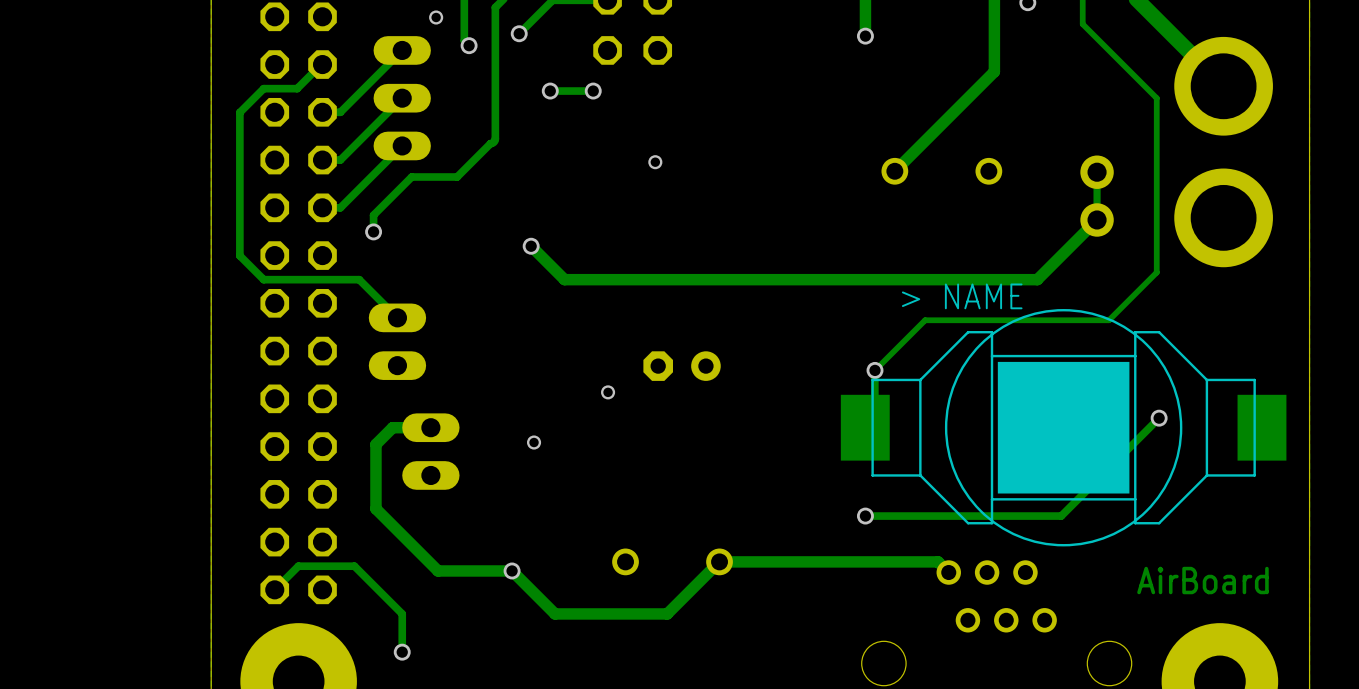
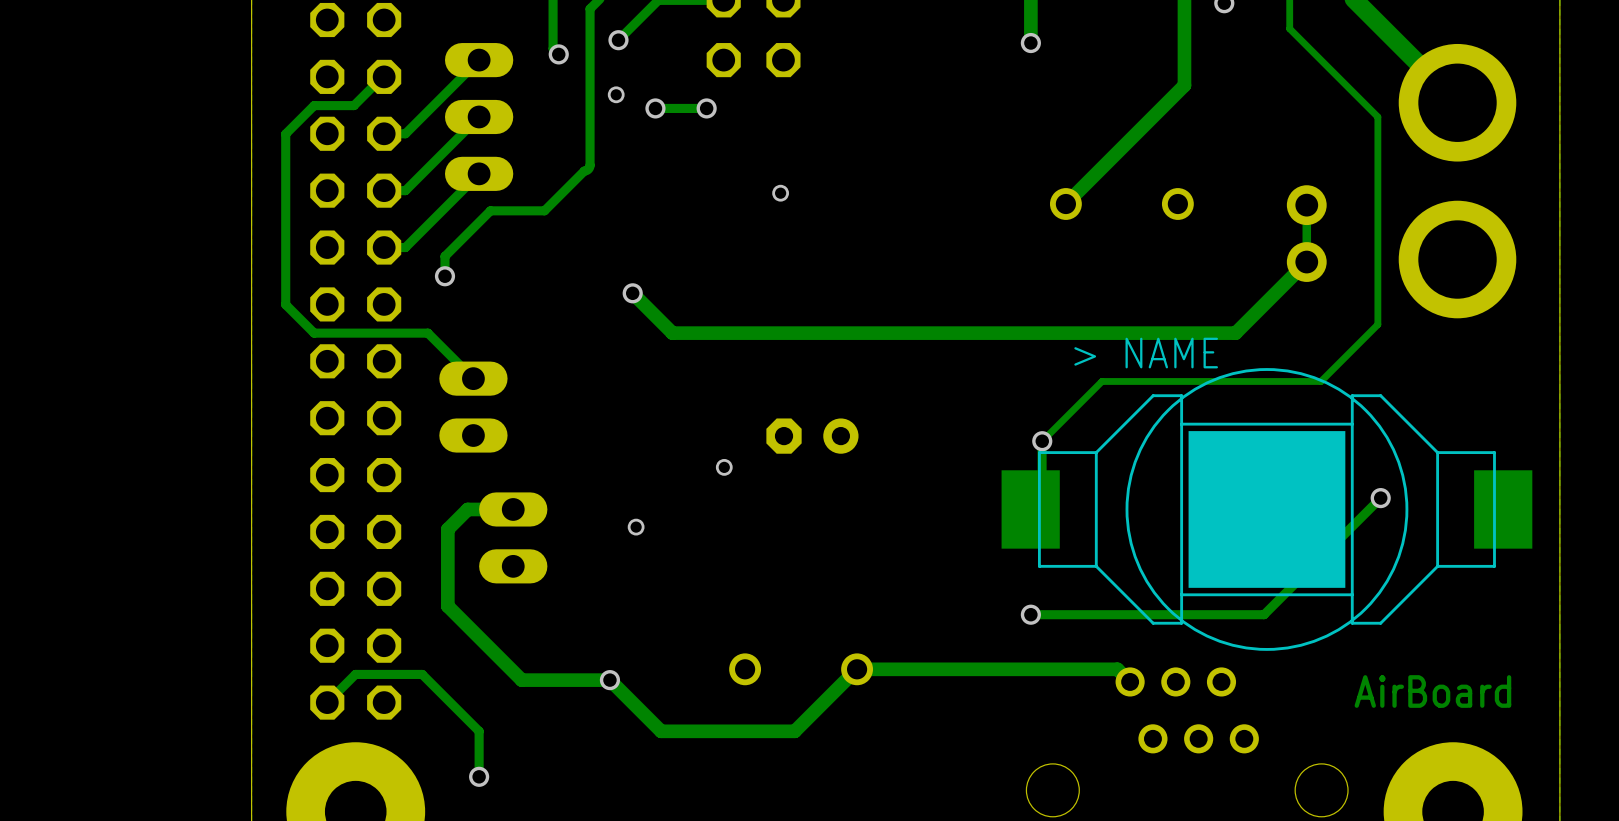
via position: (436, 17) -> (616, 94)

